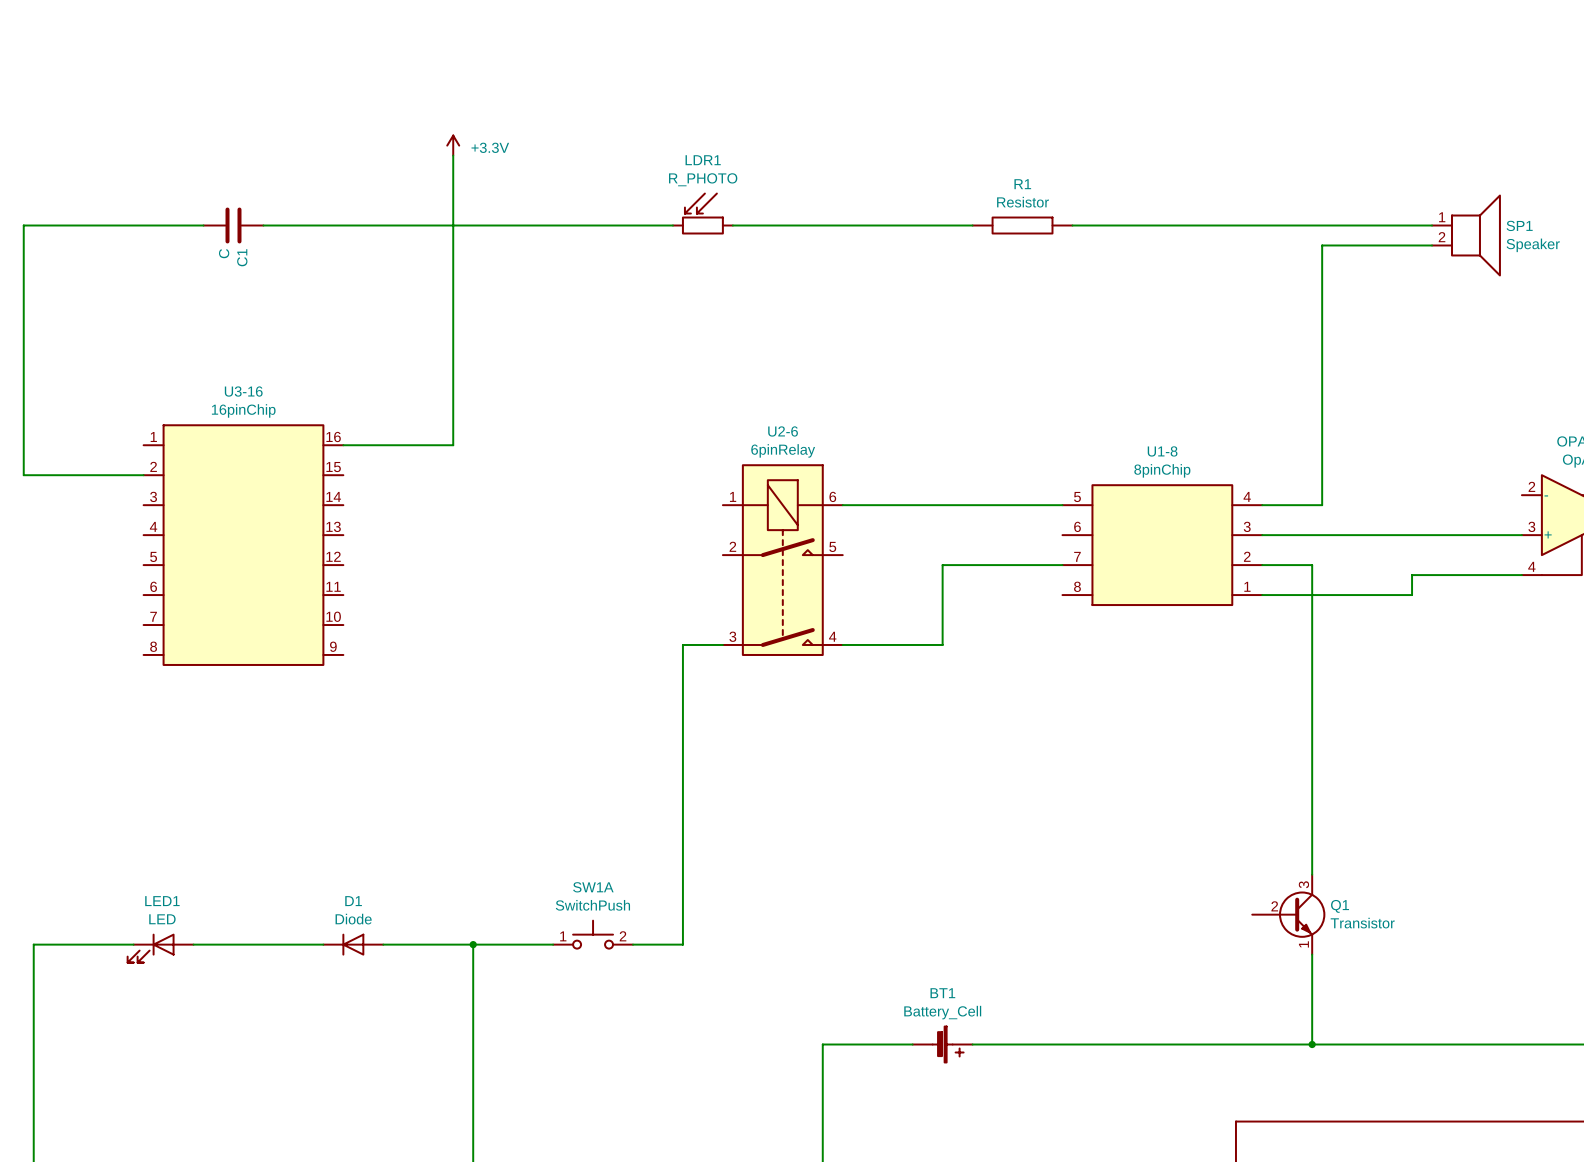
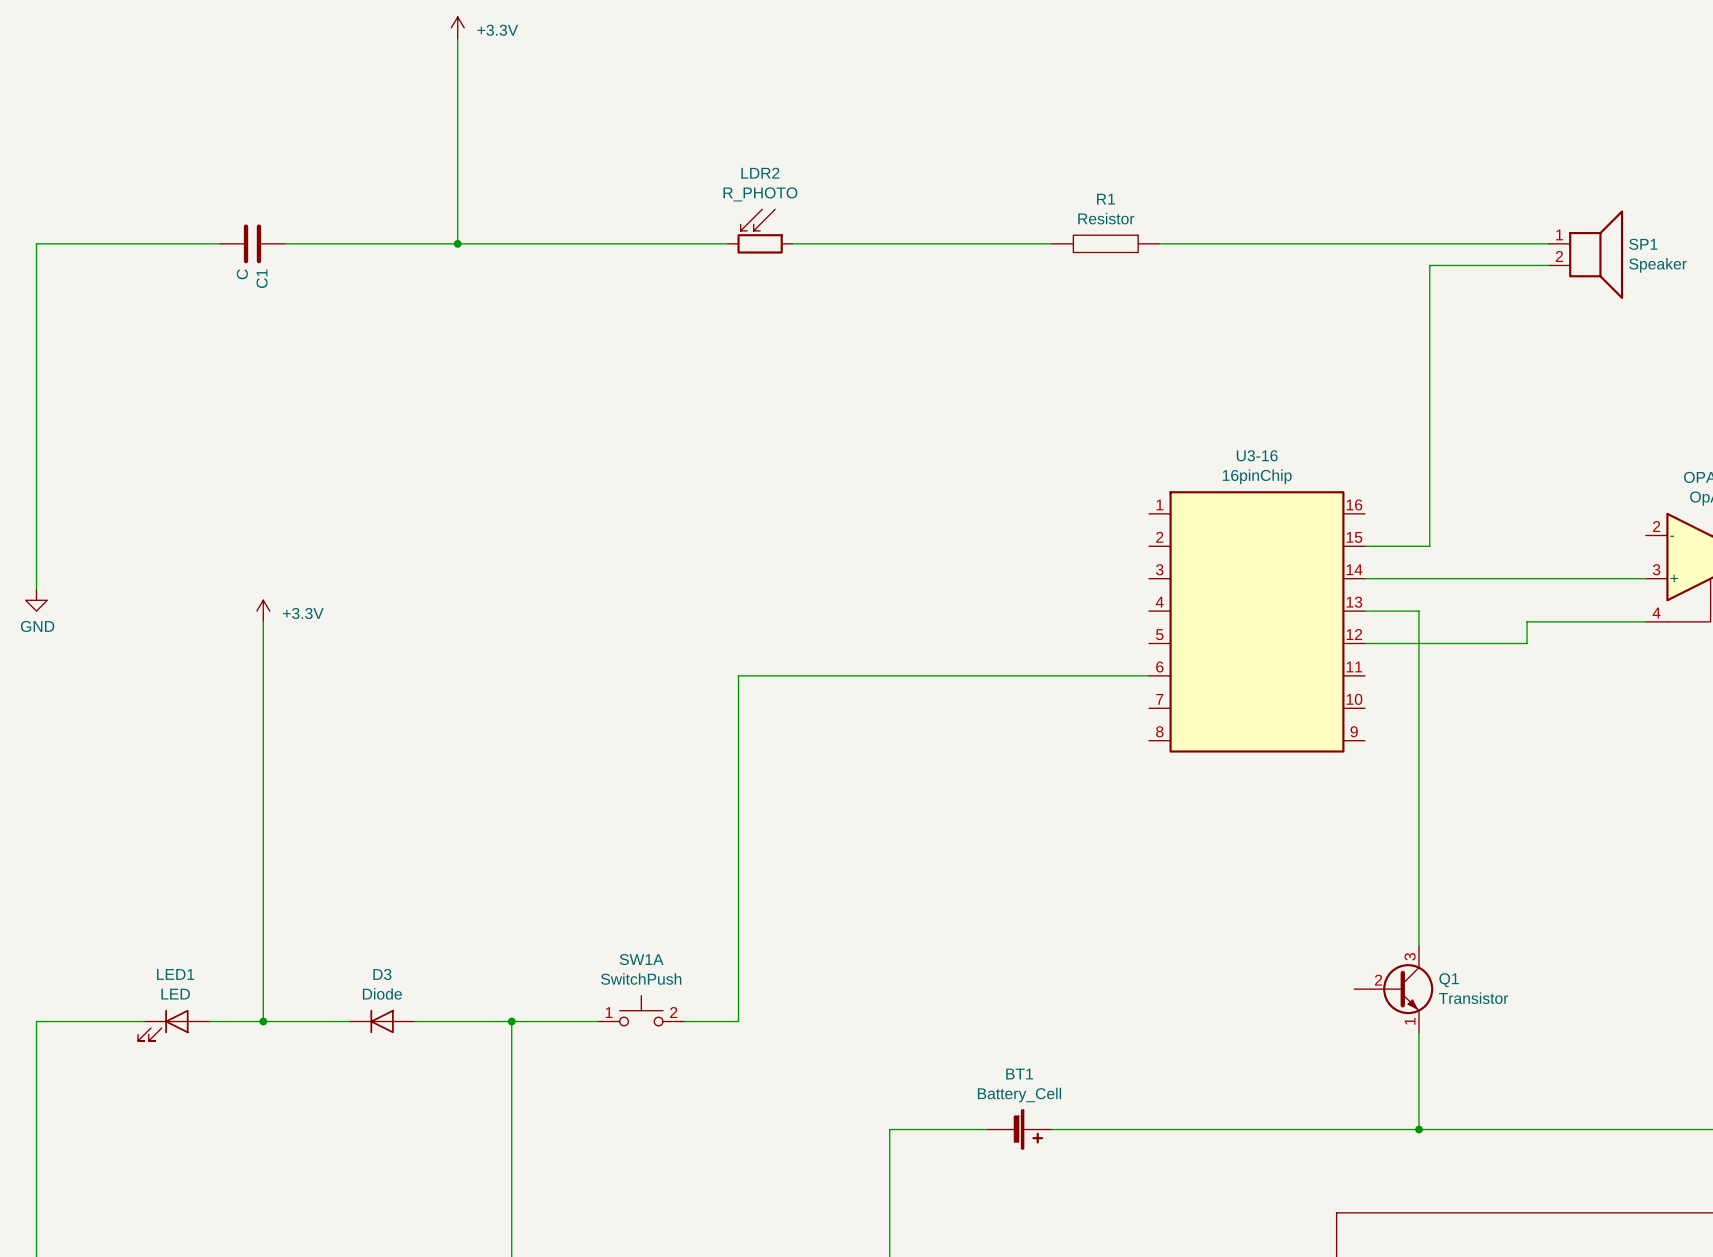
wire: none -> (457, 38) (457, 243)
power symbol position: +3.3V (453, 145) -> +3.3V (457, 27)
wire: (453, 155) (453, 445) (343, 445) -> none
LDR1 name: LDR1 (703, 160) -> LDR2 (760, 173)
wire: (33, 225) (23, 225) (23, 475) (143, 475) -> (36, 243) (36, 589)
junction: none -> (457, 243)
wire: (842, 505) (1062, 505) -> none
U3-16 position: (243, 545) -> (1256, 621)
U1-8: 8pinChip (1162, 545) -> none
power symbol: none -> GND (36, 600)
U2-6: 6pinRelay (782, 560) -> none
power symbol: none -> +3.3V (263, 611)
wire: (1062, 565) (942, 565) (942, 644) (842, 644) -> none
wire: none -> (263, 621) (263, 1021)
wire: (682, 644) (722, 644) -> (738, 697) (738, 675) (1148, 675)
D1 name: D1 (353, 901) -> D3 (382, 974)
junction: none -> (263, 1021)

